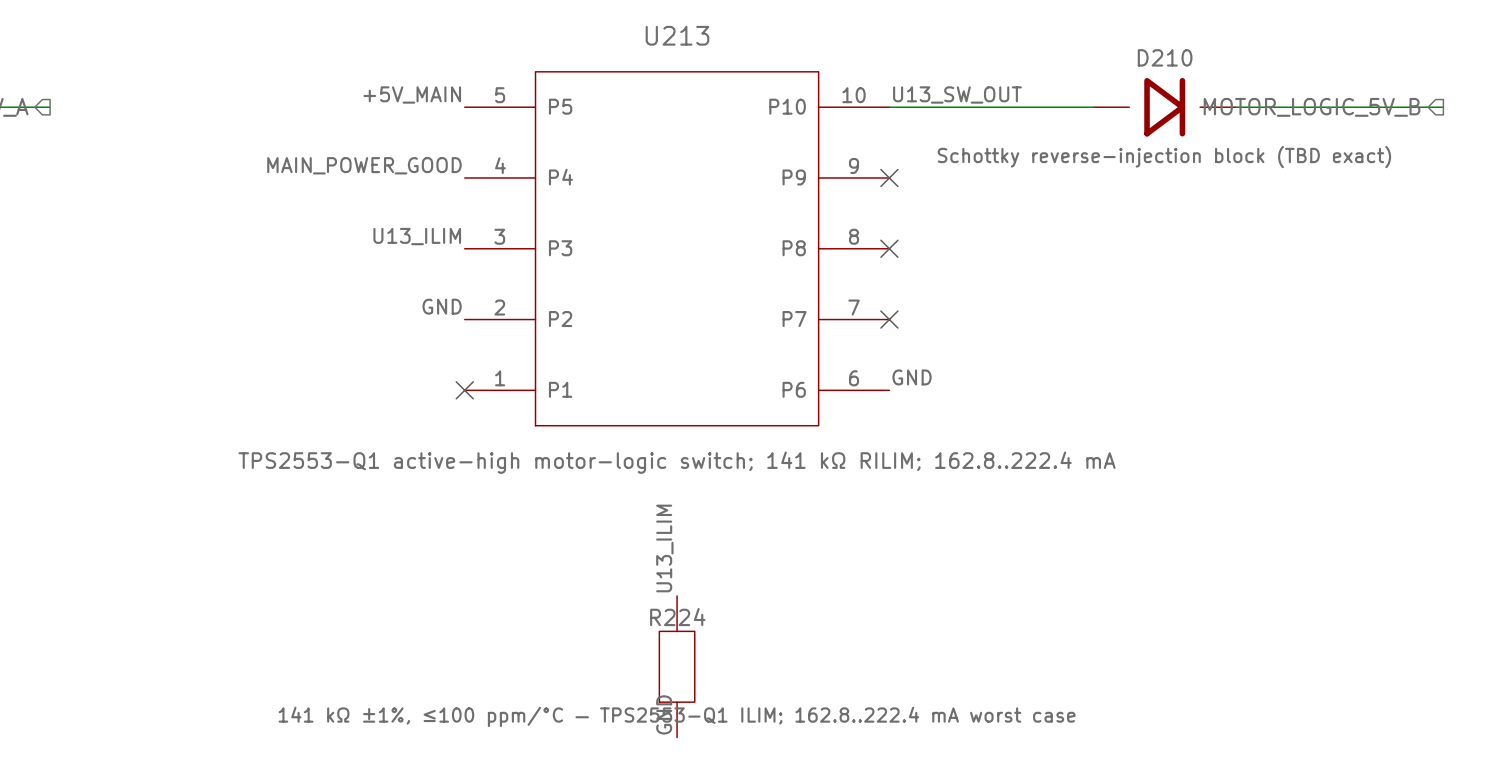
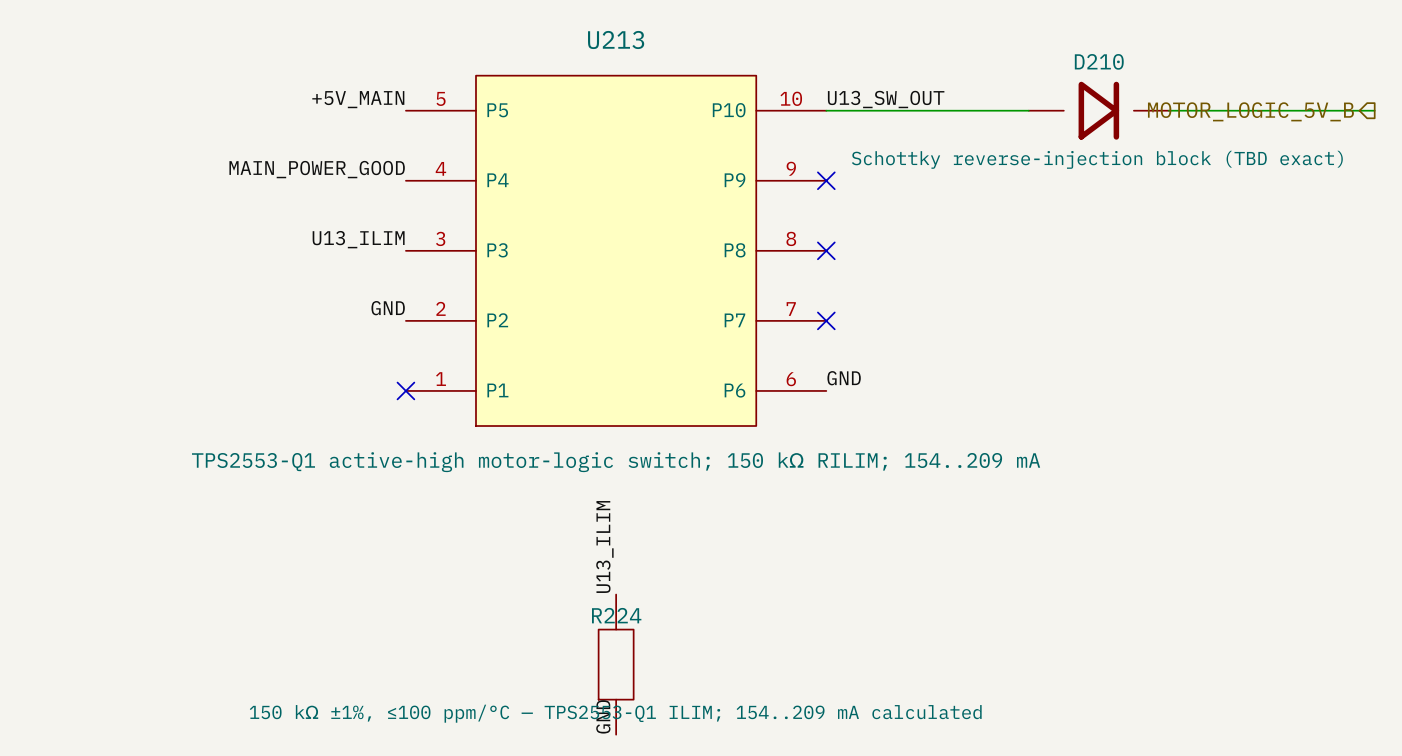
U213 value: TPS2553-Q1 active-high motor-logic switch; 141 kΩ RILIM; 162.8..222.4 mA (677, 462) -> TPS2553-Q1 active-high motor-logic switch; 150 kΩ RILIM; 154..209 mA (616, 462)
R224 value: 141 kΩ ±1%, ≤100 ppm/°C — TPS2553-Q1 ILIM; 162.8..222.4 mA worst case (677, 716) -> 150 kΩ ±1%, ≤100 ppm/°C — TPS2553-Q1 ILIM; 154..209 mA calculated (615, 713)

